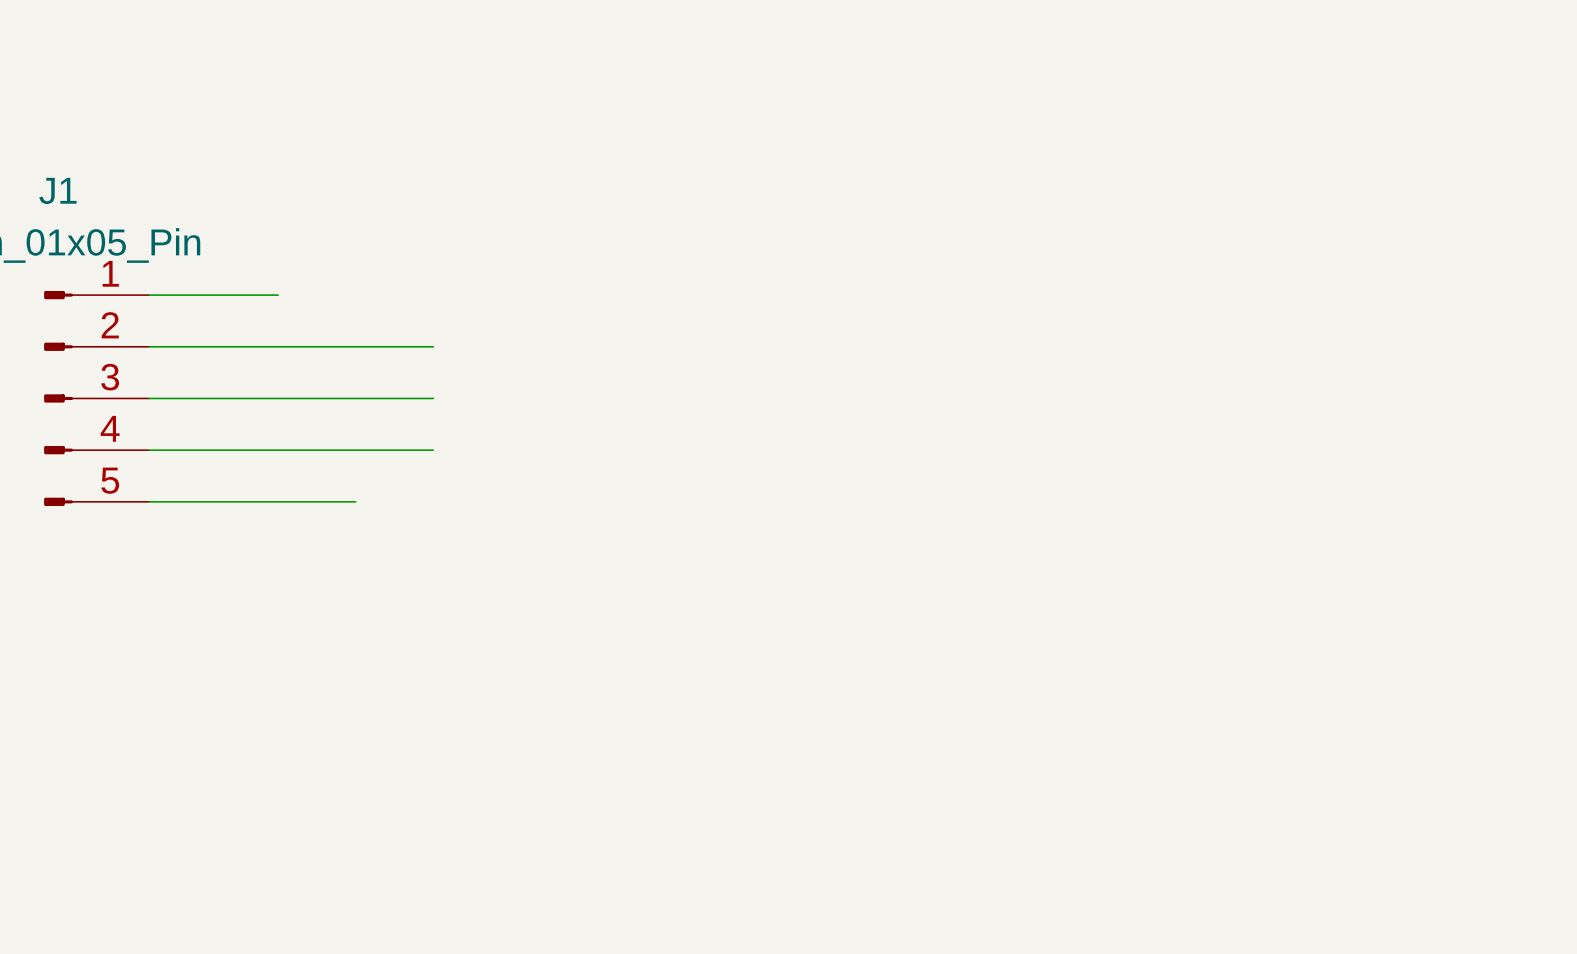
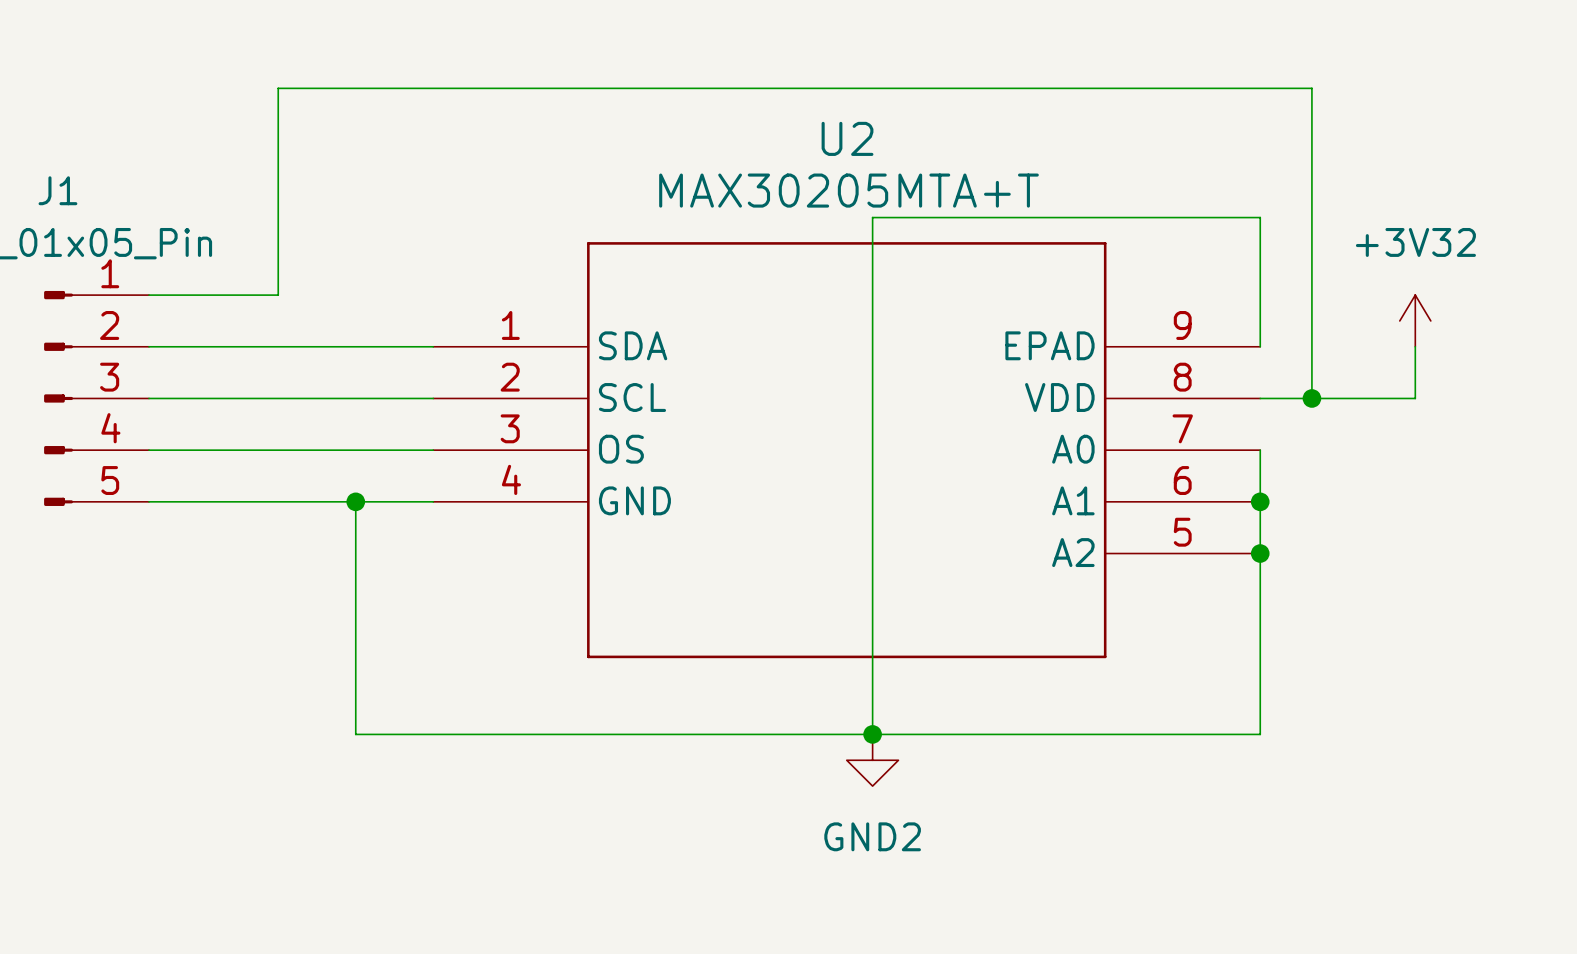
wire: none -> (278, 295) (278, 88) (1311, 88) (1311, 398)
power symbol: none -> +3V32 (1415, 320)
wire: none -> (1260, 346) (1260, 217) (872, 217) (872, 734)
wire: none -> (1415, 346) (1415, 398) (1260, 398)
junction: none -> (1311, 398)
U2: none -> MAX30205MTA+T (846, 450)
wire: none -> (1260, 450) (1260, 734) (355, 734) (355, 501) (433, 501)
junction: none -> (355, 501)
junction: none -> (1260, 501)
junction: none -> (1260, 553)
junction: none -> (872, 734)
power symbol: none -> GND2 (872, 760)

